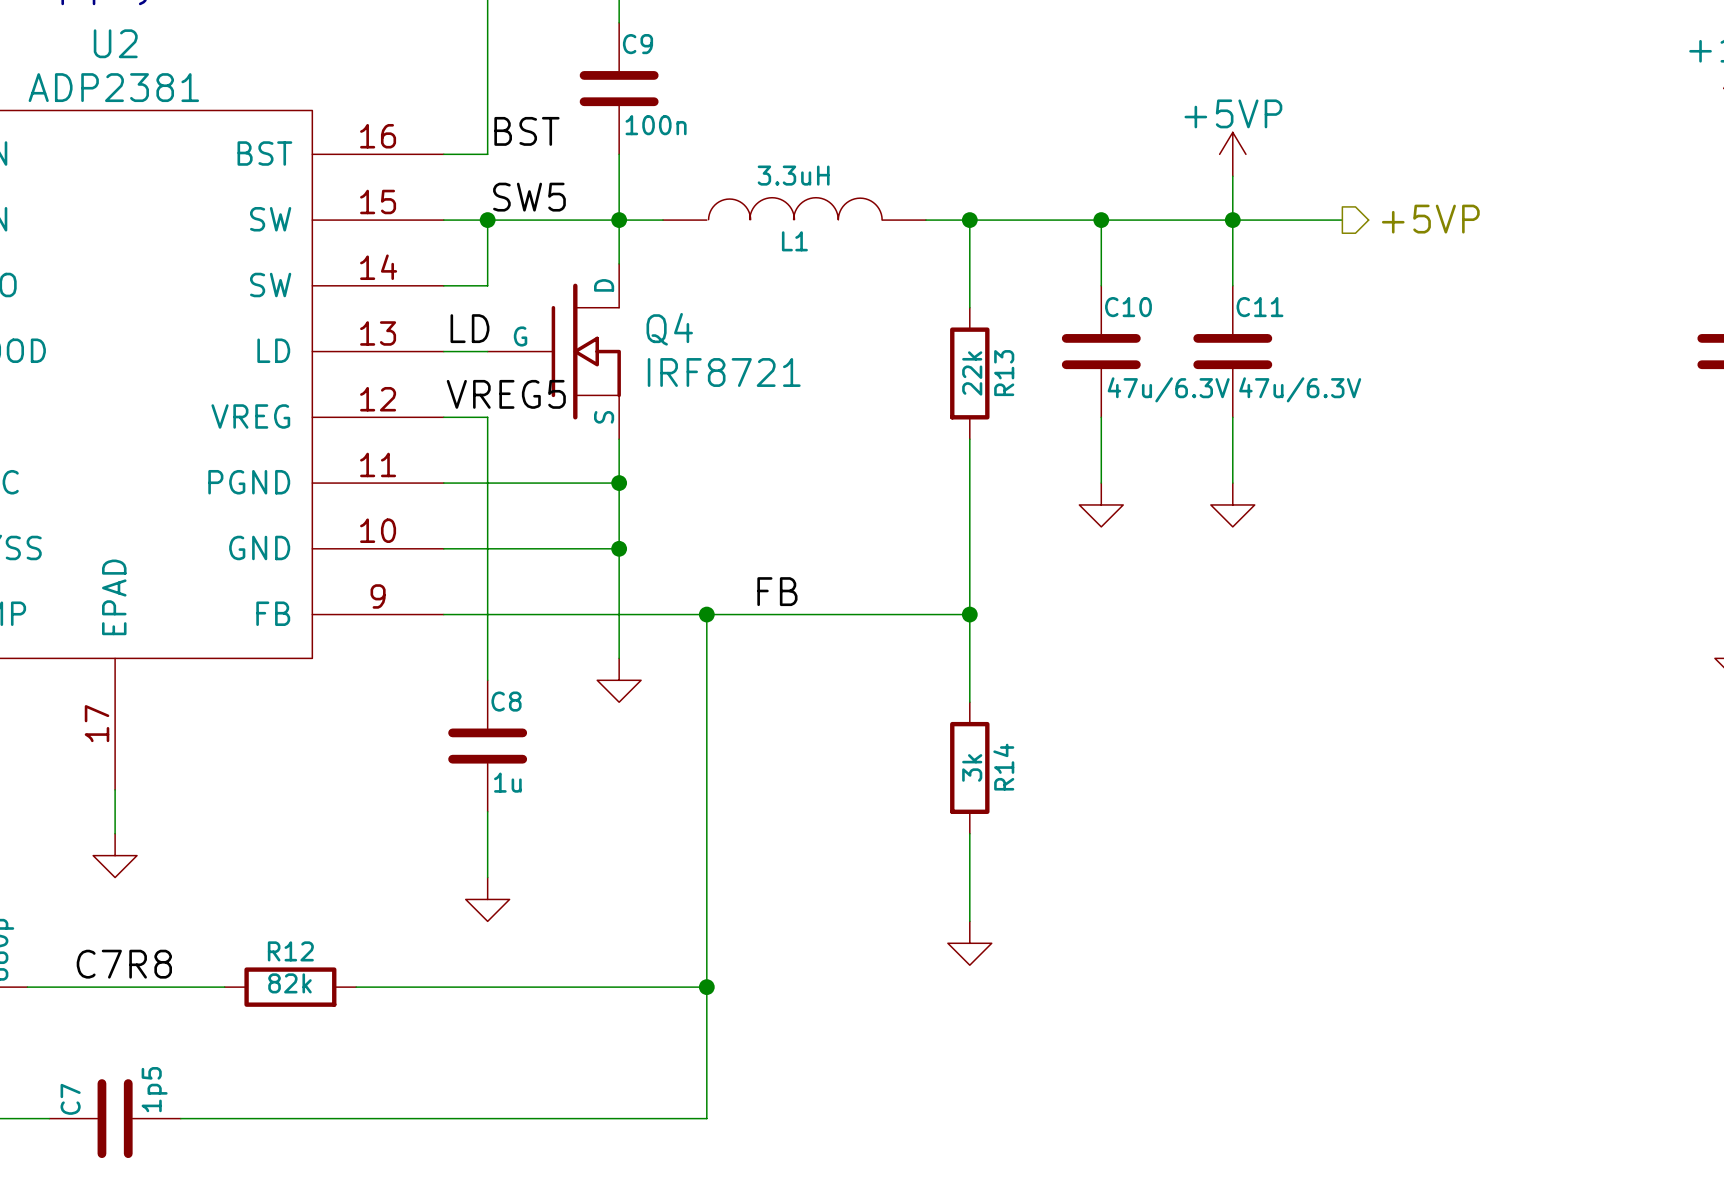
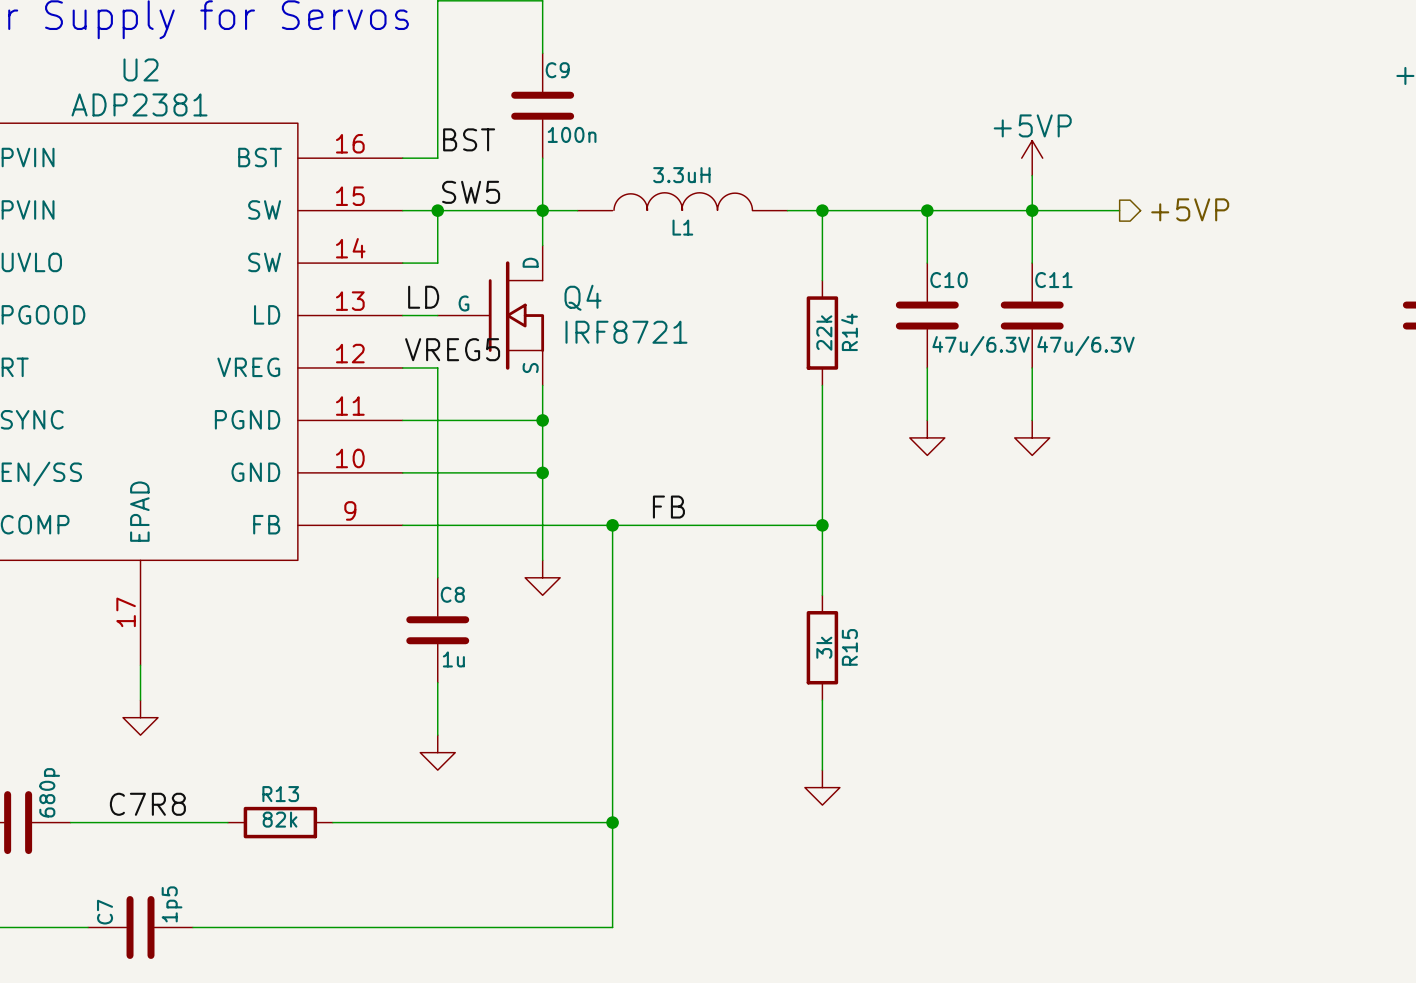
R13 name: R13 (1004, 373) -> R14 (849, 332)
R14 name: R14 (1003, 767) -> R15 (849, 647)
R12 name: R12 (290, 951) -> R13 (280, 794)

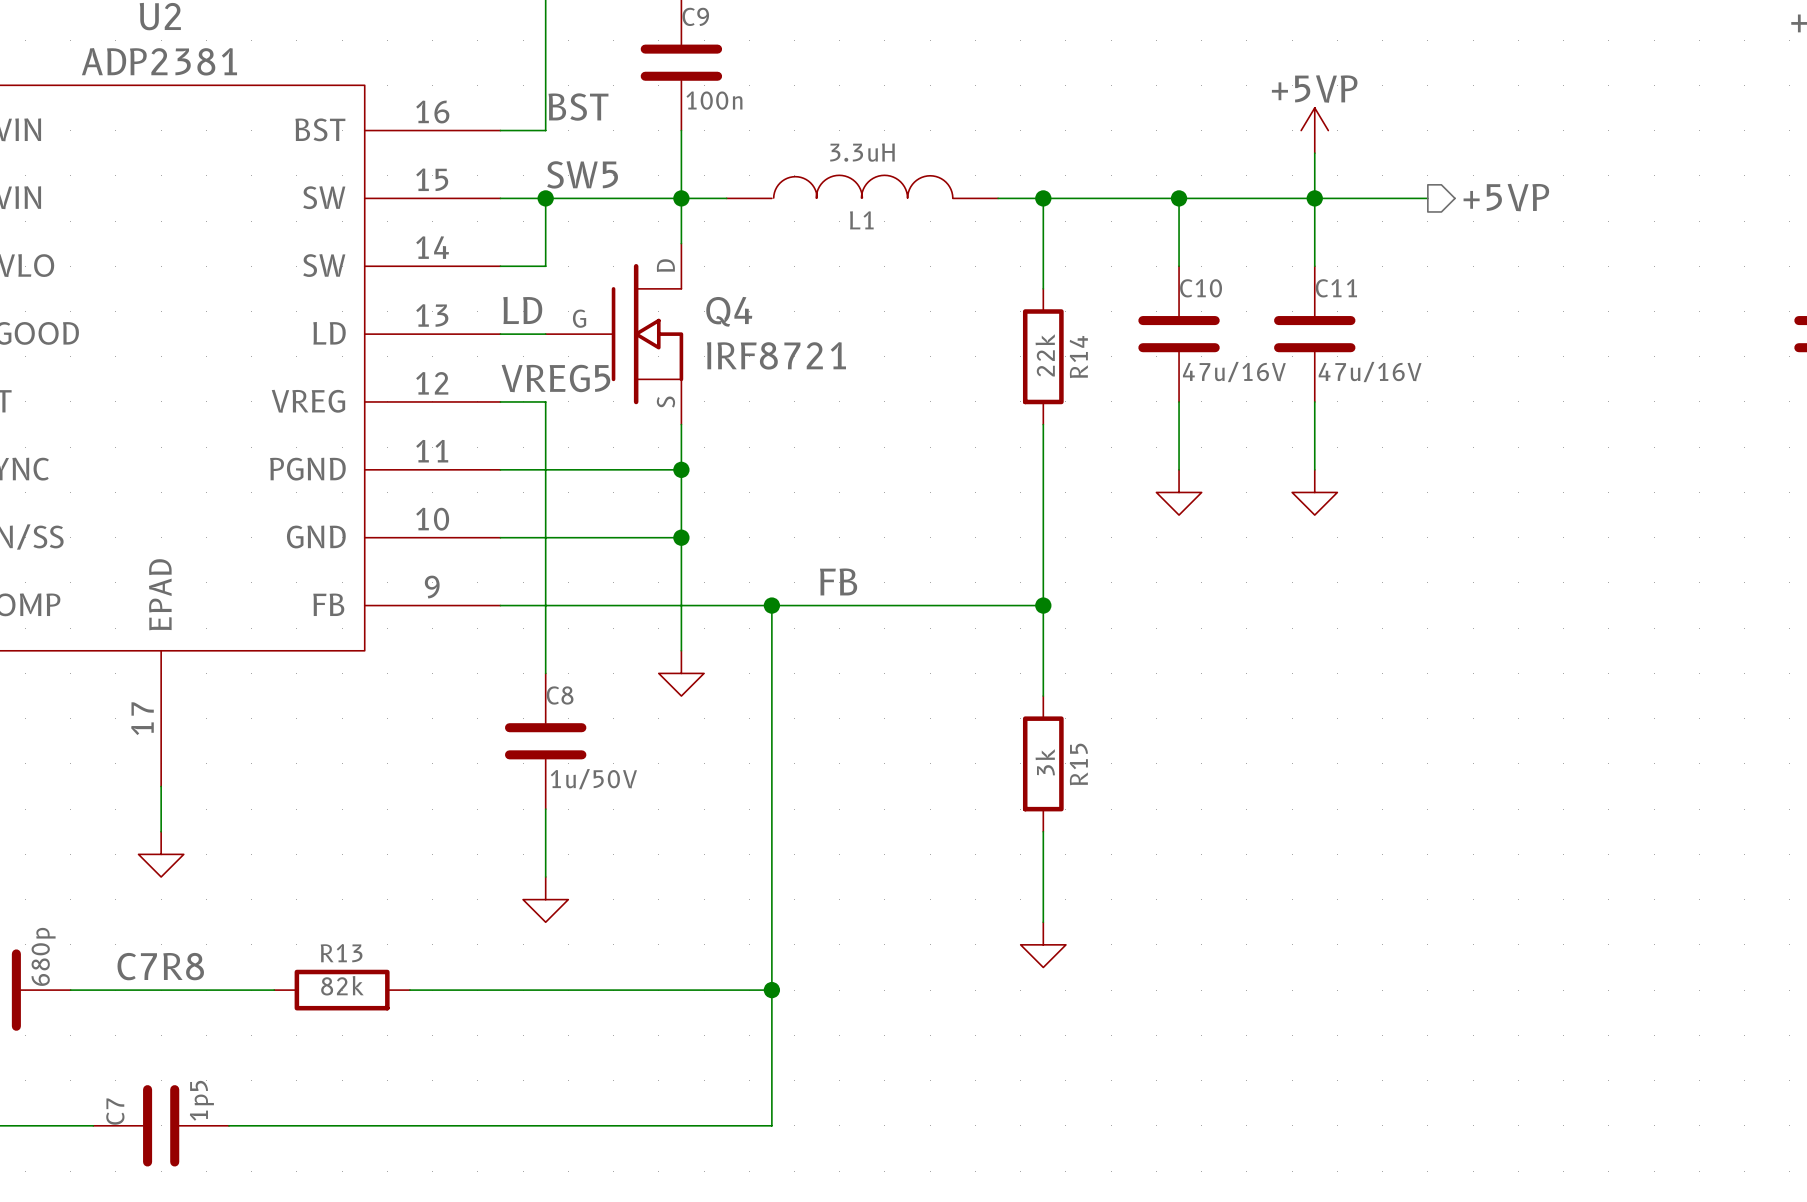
C10 value: 47u/6.3V (981, 346) -> 47u/16V (1234, 372)
C11 value: 47u/6.3V (1085, 346) -> 47u/16V (1370, 372)
C8 value: 1u (453, 659) -> 1u/50V (593, 779)

